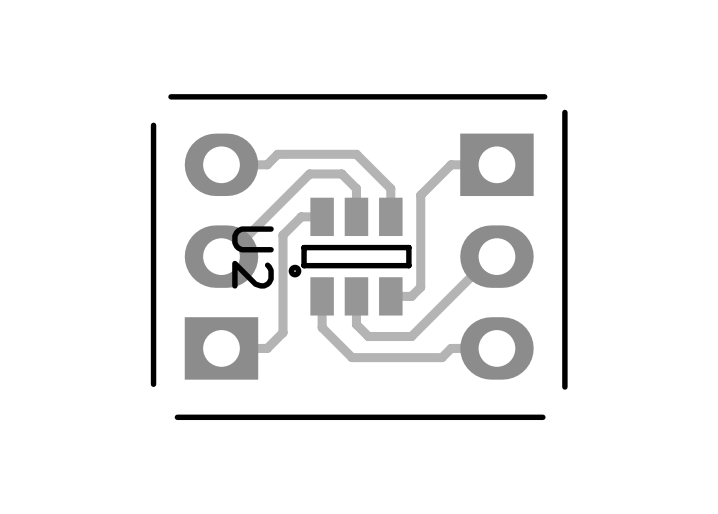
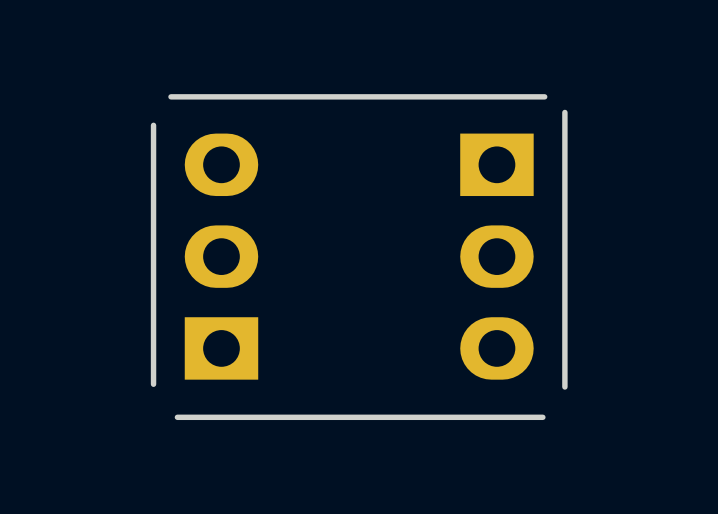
track: (221, 164) (267, 164) (277, 154) (356, 154) (390, 188) (390, 216) -> none
track: (496, 164) (451, 164) (420, 195) (420, 287) (411, 296) (390, 296) -> none
track: (322, 216) (301, 216) (283, 235) (283, 332) (267, 348) (221, 348) -> none
track: (356, 216) (356, 188) (341, 173) (309, 173) (227, 256) (221, 256) -> none
U2: (350, 256) -> none
track: (496, 256) (491, 256) (411, 336) (368, 336) (356, 324) (356, 296) -> none
track: (322, 296) (322, 327) (352, 357) (442, 357) (451, 348) (496, 348) -> none

